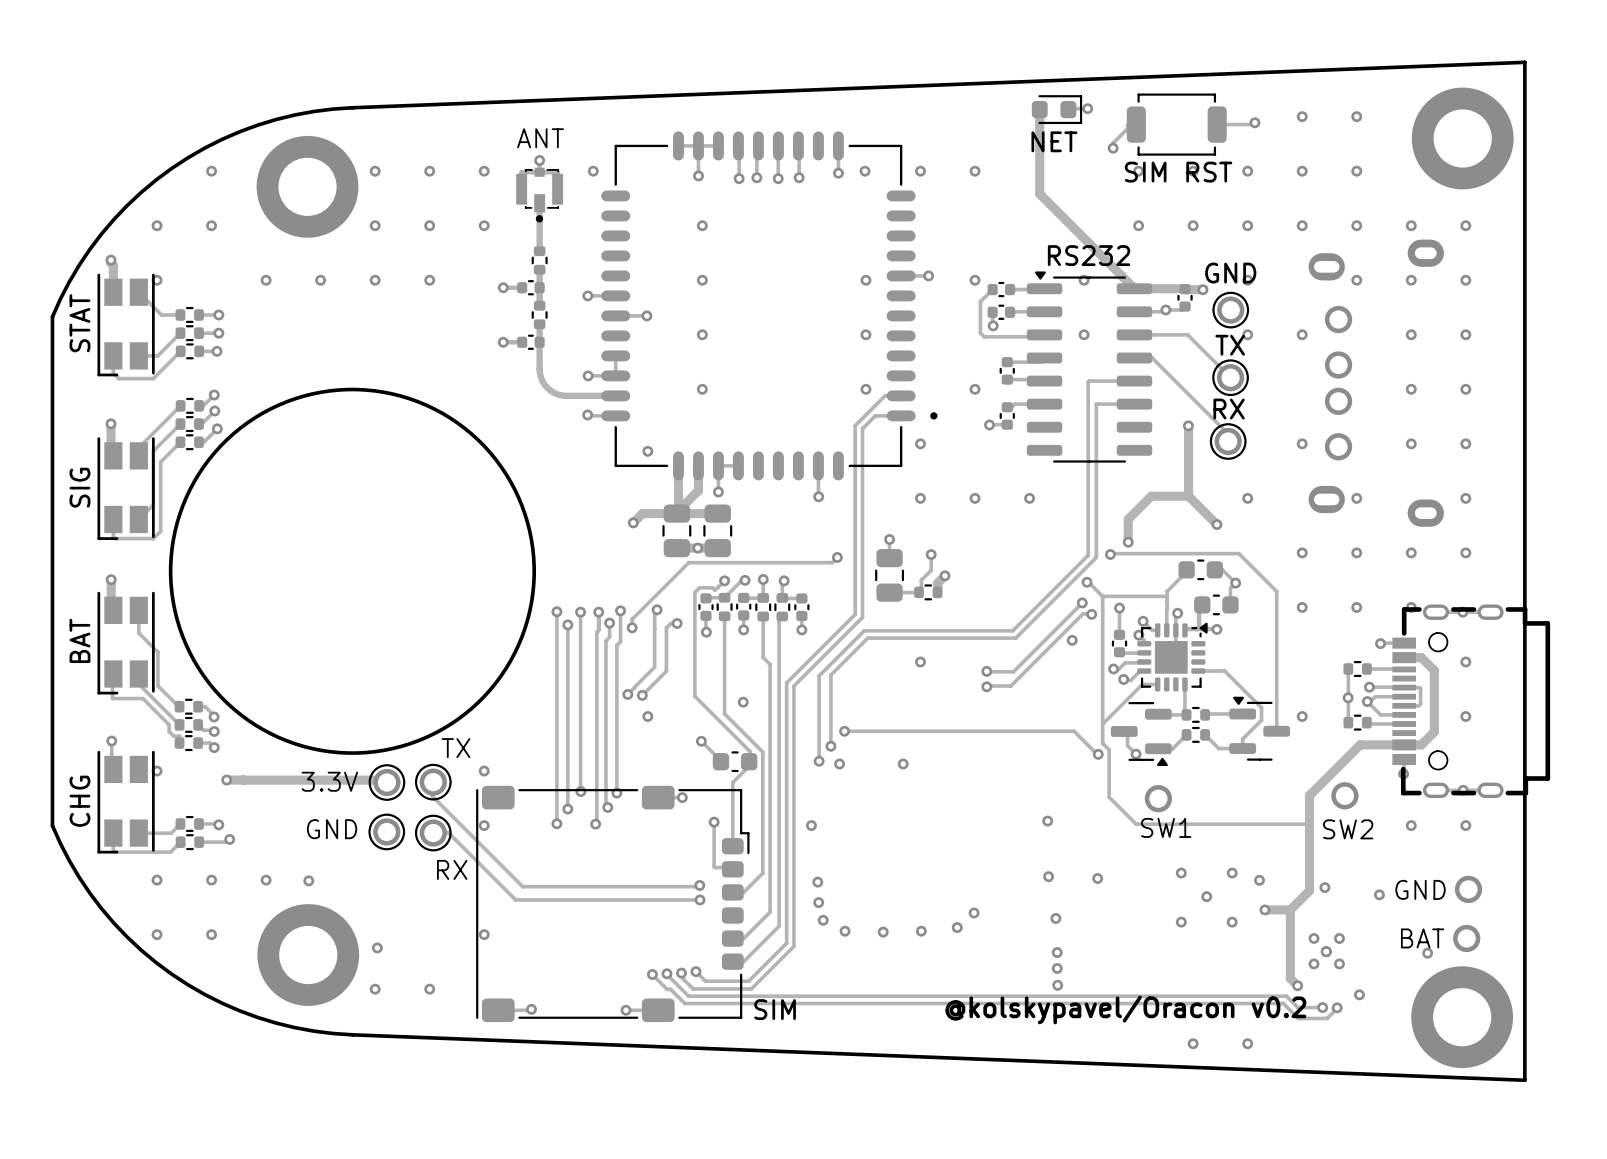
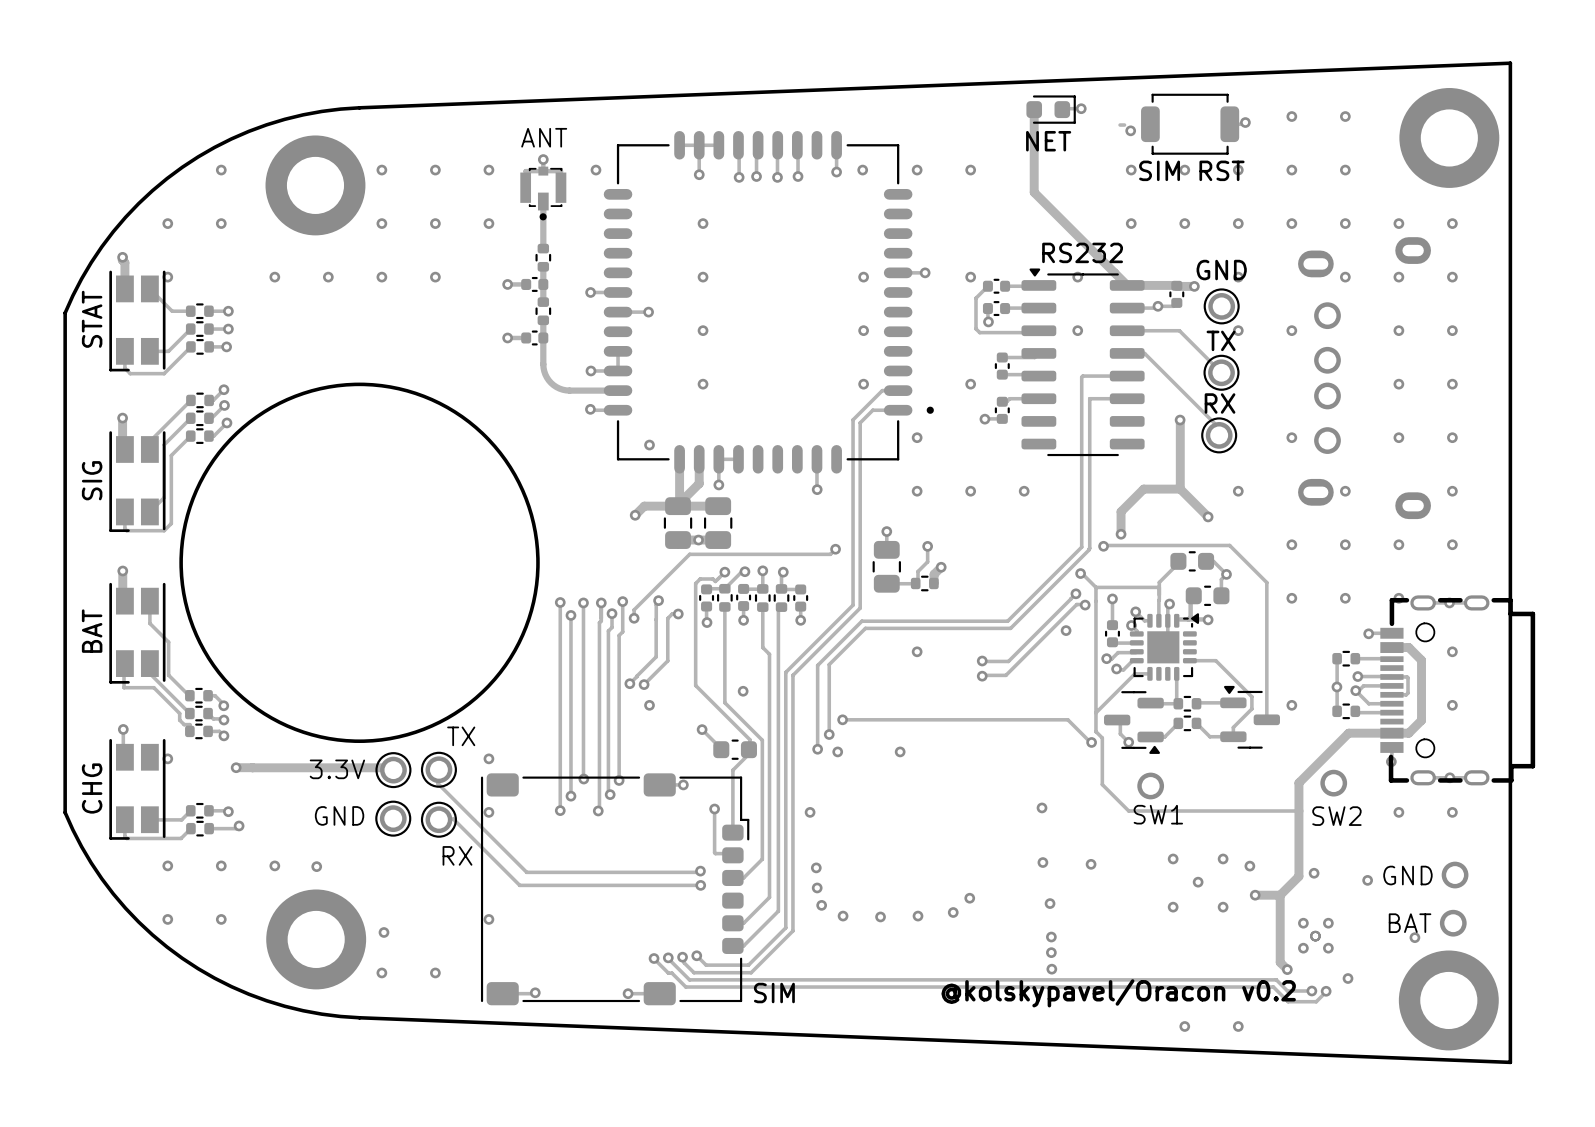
track: (1131, 124) (1113, 143) (1113, 148) -> none
part position: (1176, 124) -> (1190, 124)
via position: (1113, 148) -> (1130, 130)

